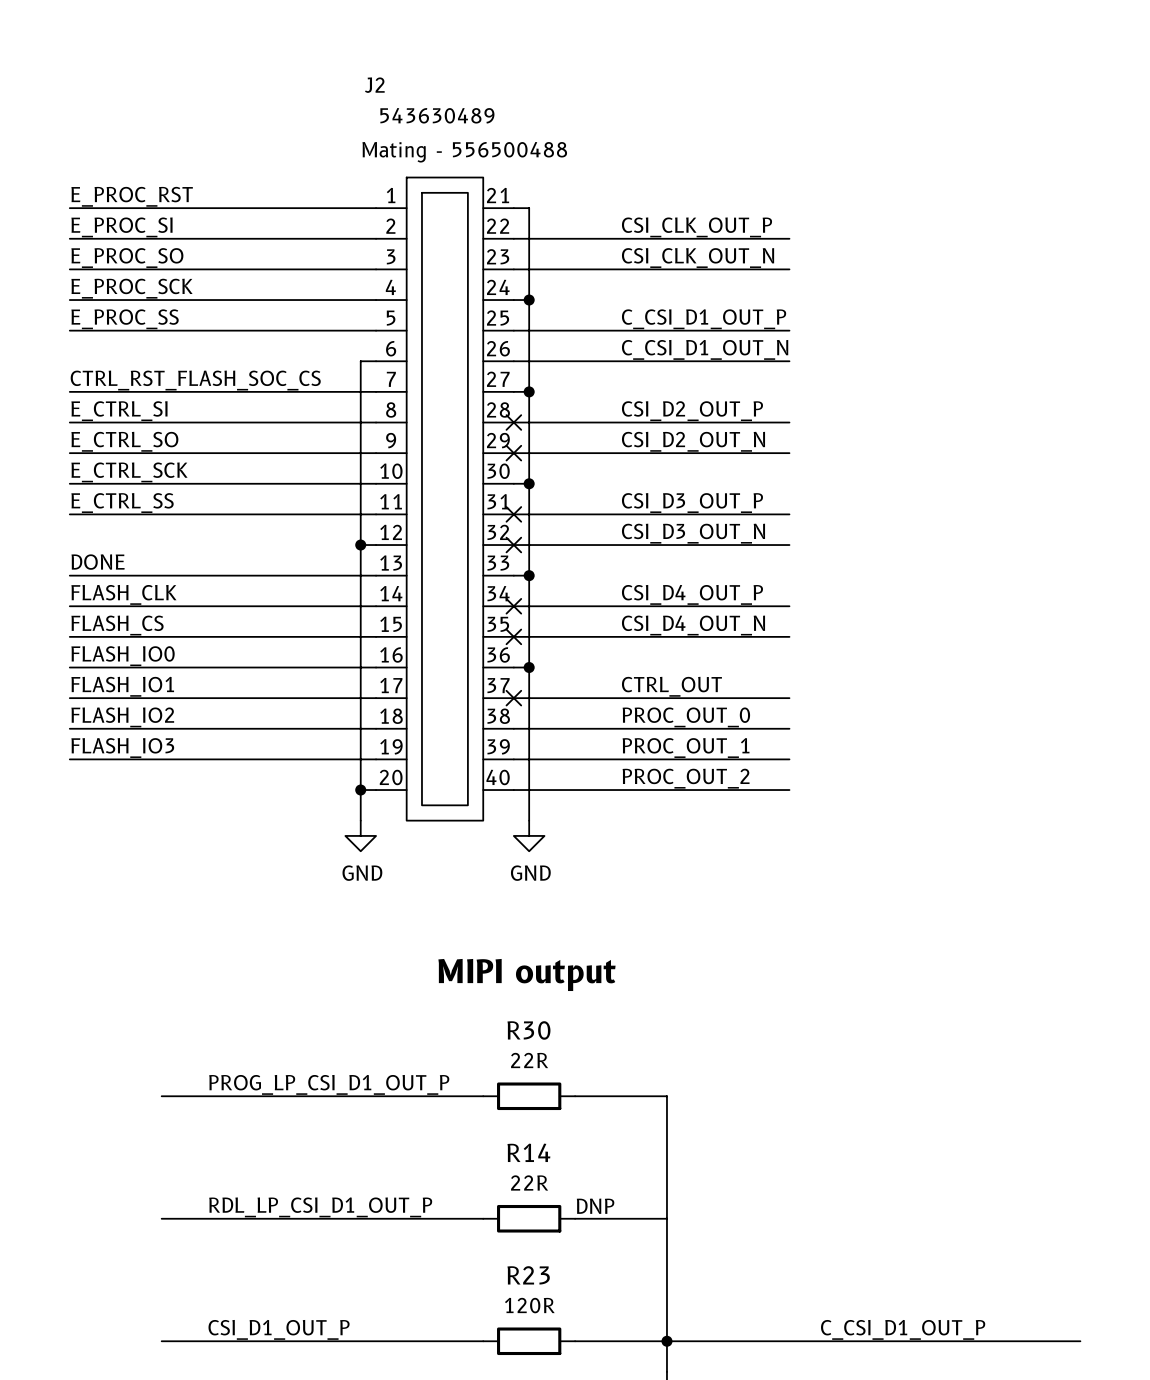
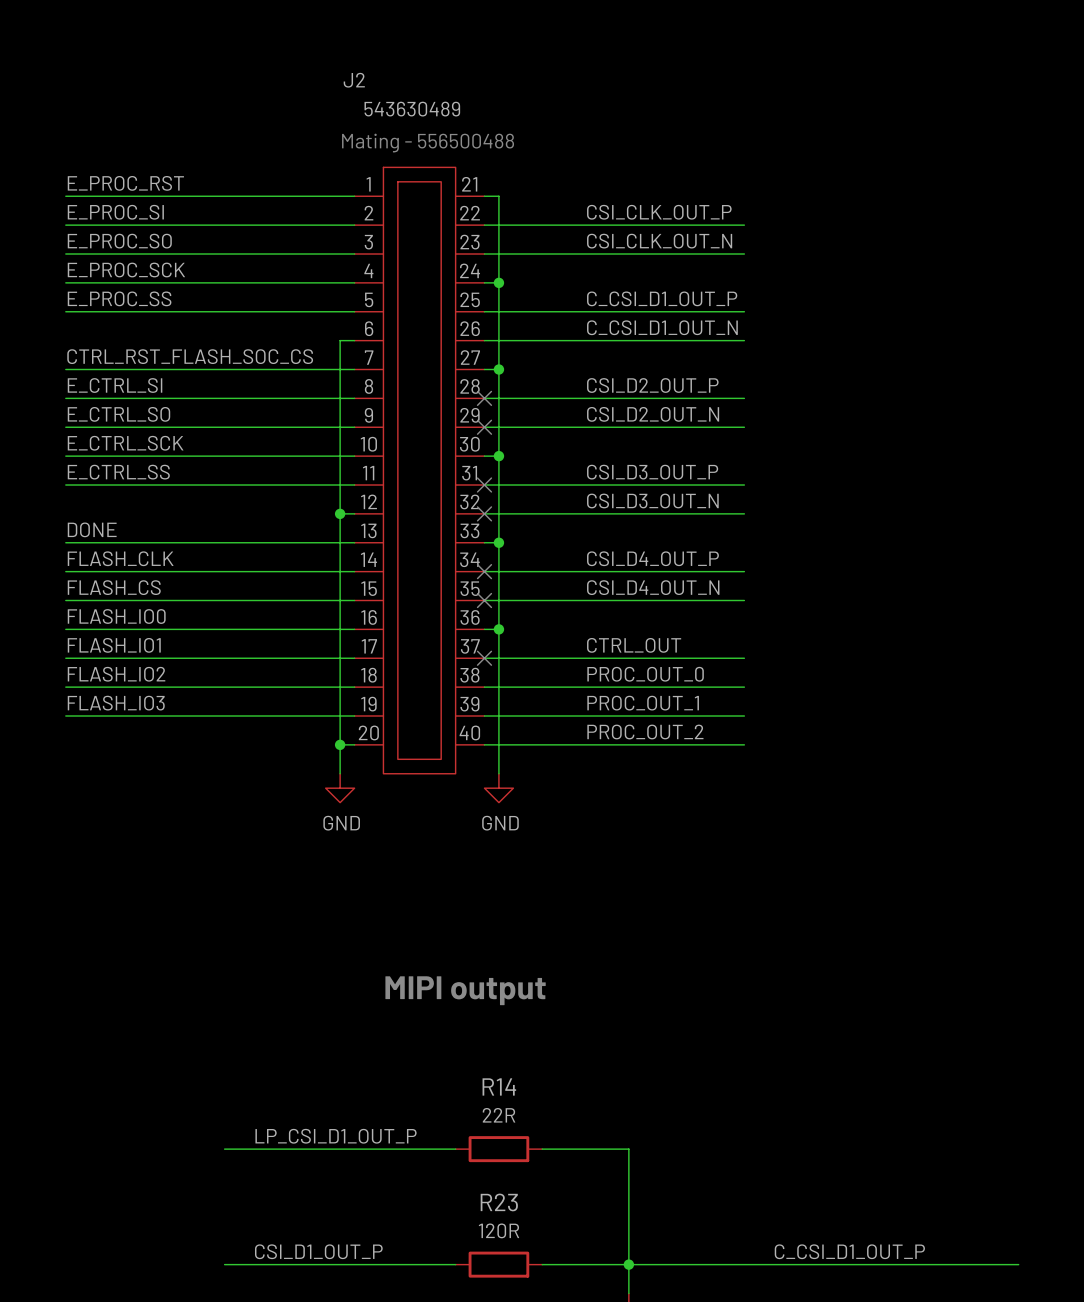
text position: MIPI output (526, 974) -> MIPI output (465, 990)
label: PROG_LP_CSI_D1_OUT_P (329, 1084) -> none
wire: (161, 1096) (483, 1096) -> none
R30: (529, 1096) -> none
wire: (575, 1096) (666, 1096) (666, 1218) -> none
text: DNP (595, 1206) -> none
label: RDL_LP_CSI_D1_OUT_P (320, 1207) -> LP_CSI_D1_OUT_P (336, 1136)
wire: (161, 1218) (238, 1218) -> none
label position: CSI_D1_OUT_P (279, 1329) -> CSI_D1_OUT_P (318, 1251)
wire: (161, 1341) (238, 1341) -> none

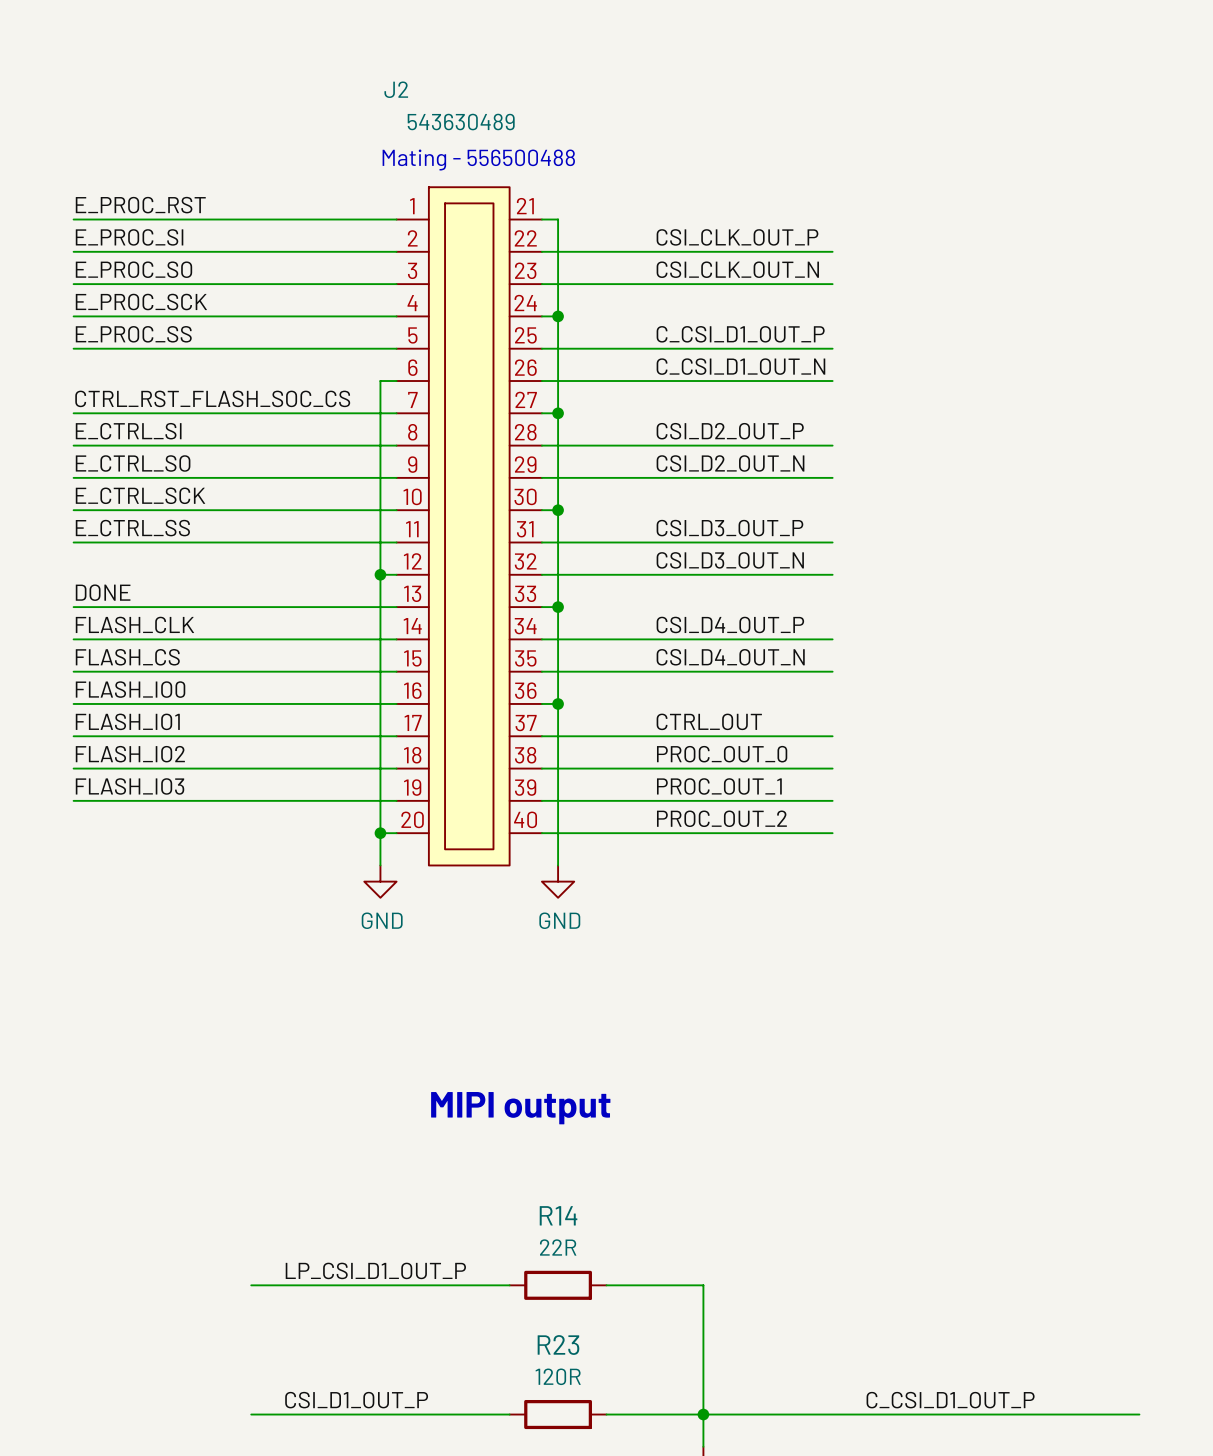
no-connect mark: (484, 398) -> none
no-connect mark: (484, 427) -> none
no-connect mark: (484, 485) -> none
no-connect mark: (484, 513) -> none
no-connect mark: (484, 571) -> none
no-connect mark: (484, 600) -> none
no-connect mark: (484, 658) -> none

